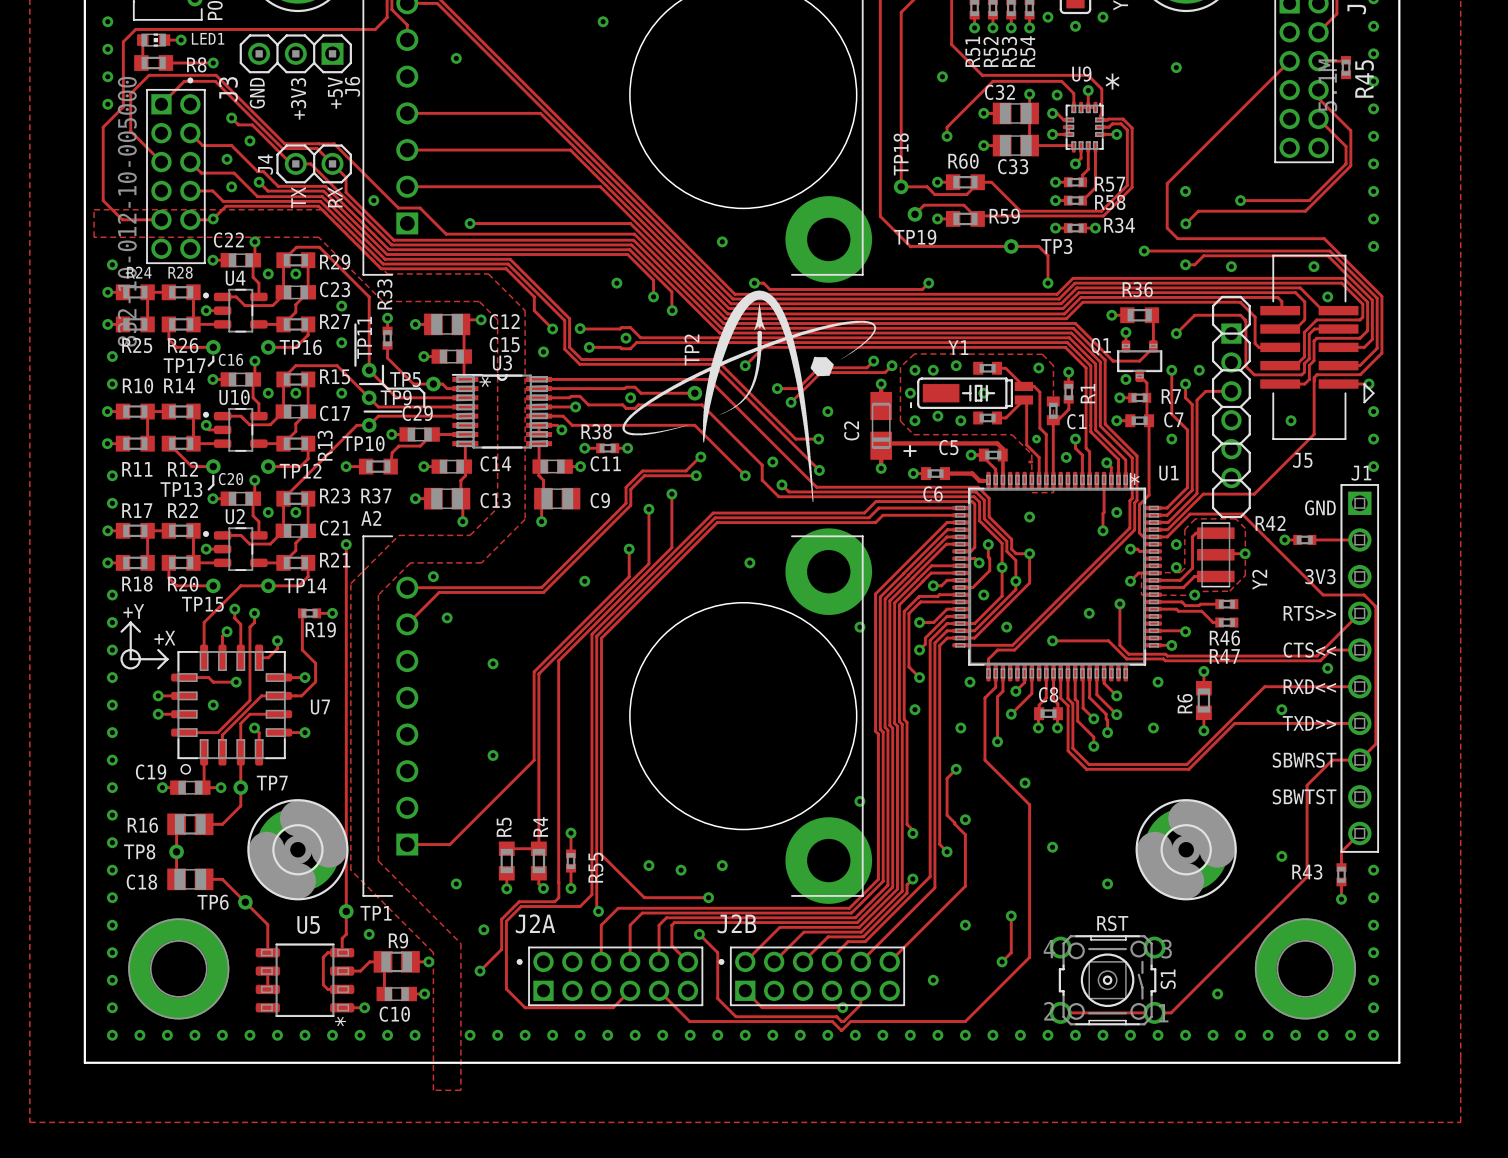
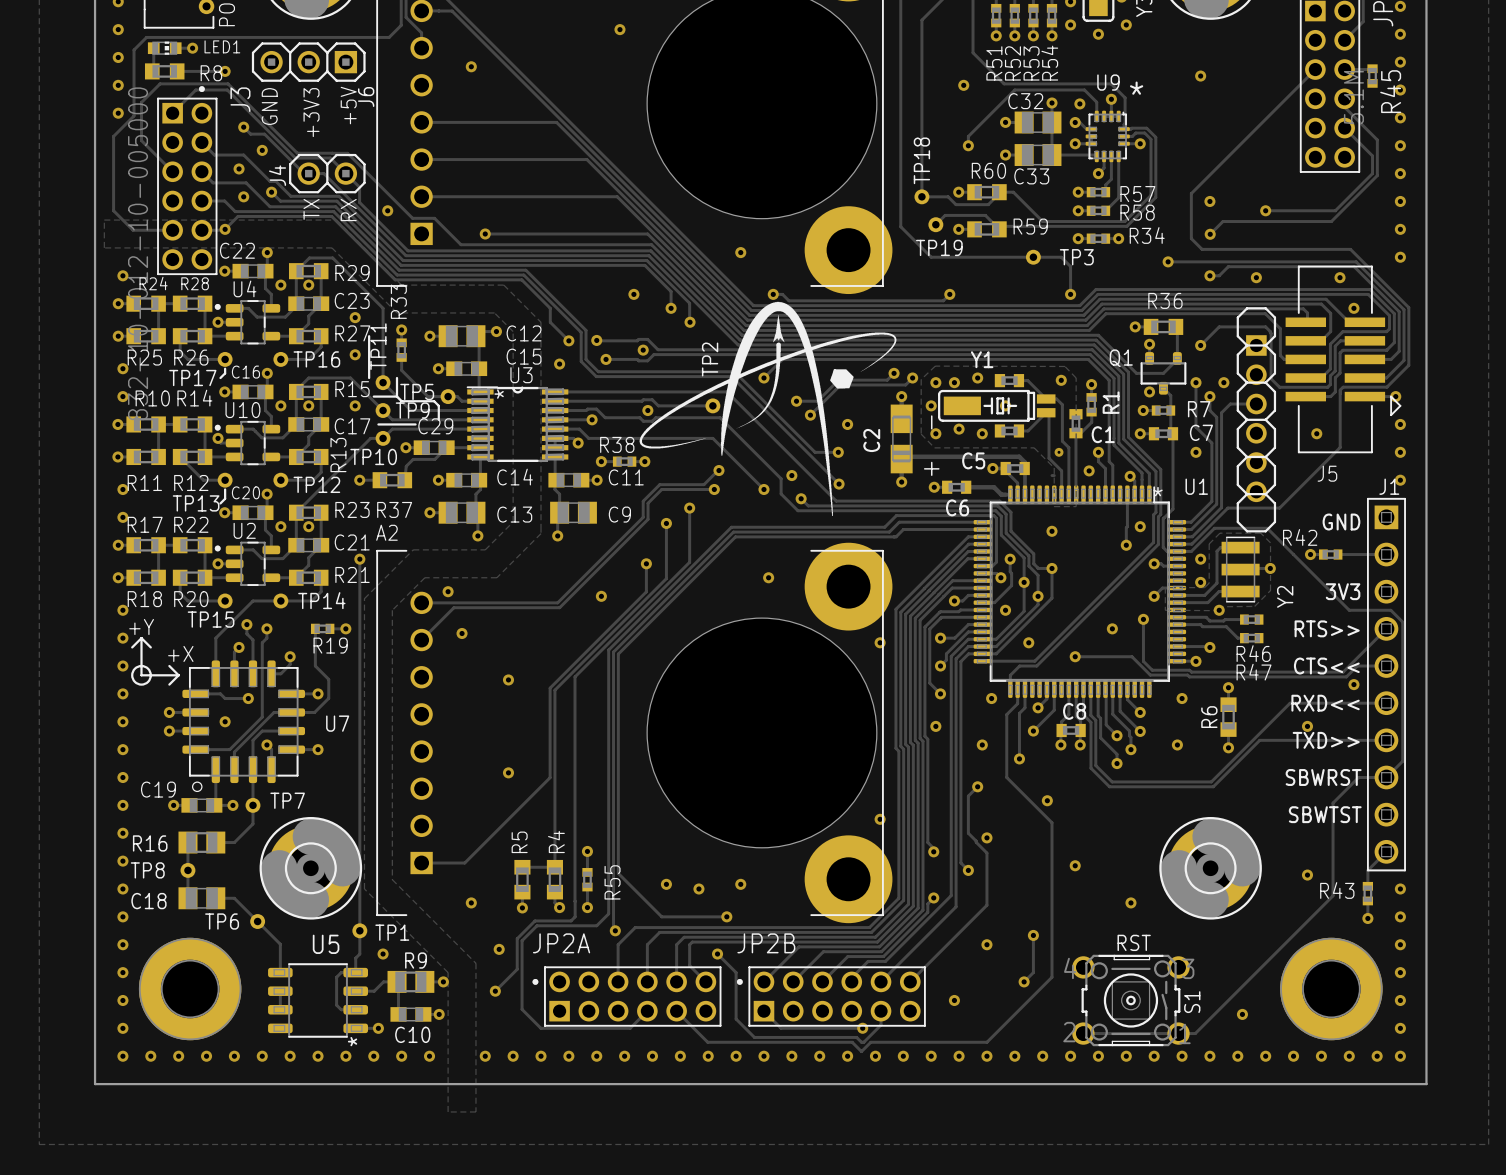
J2A name: J2A (535, 923) -> JP2A (561, 943)
J2B name: J2B (736, 923) -> JP2B (766, 943)

